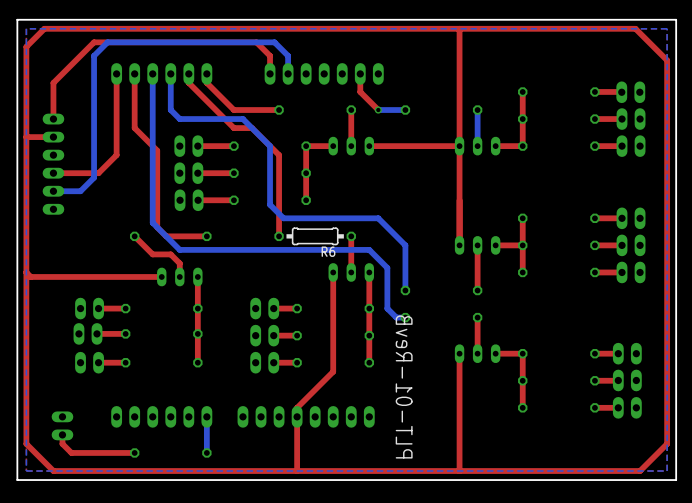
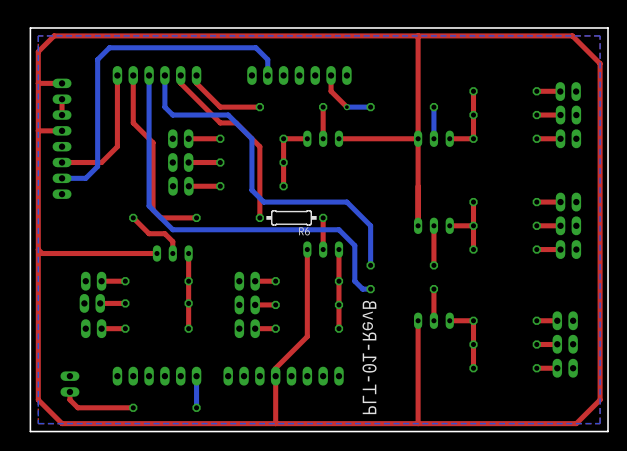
top track: (270, 73) (270, 55) (256, 42) (94, 42) (53, 82) (53, 100) -> none
top track: none -> (62, 83) (38, 83)
part: none -> (62, 91)

